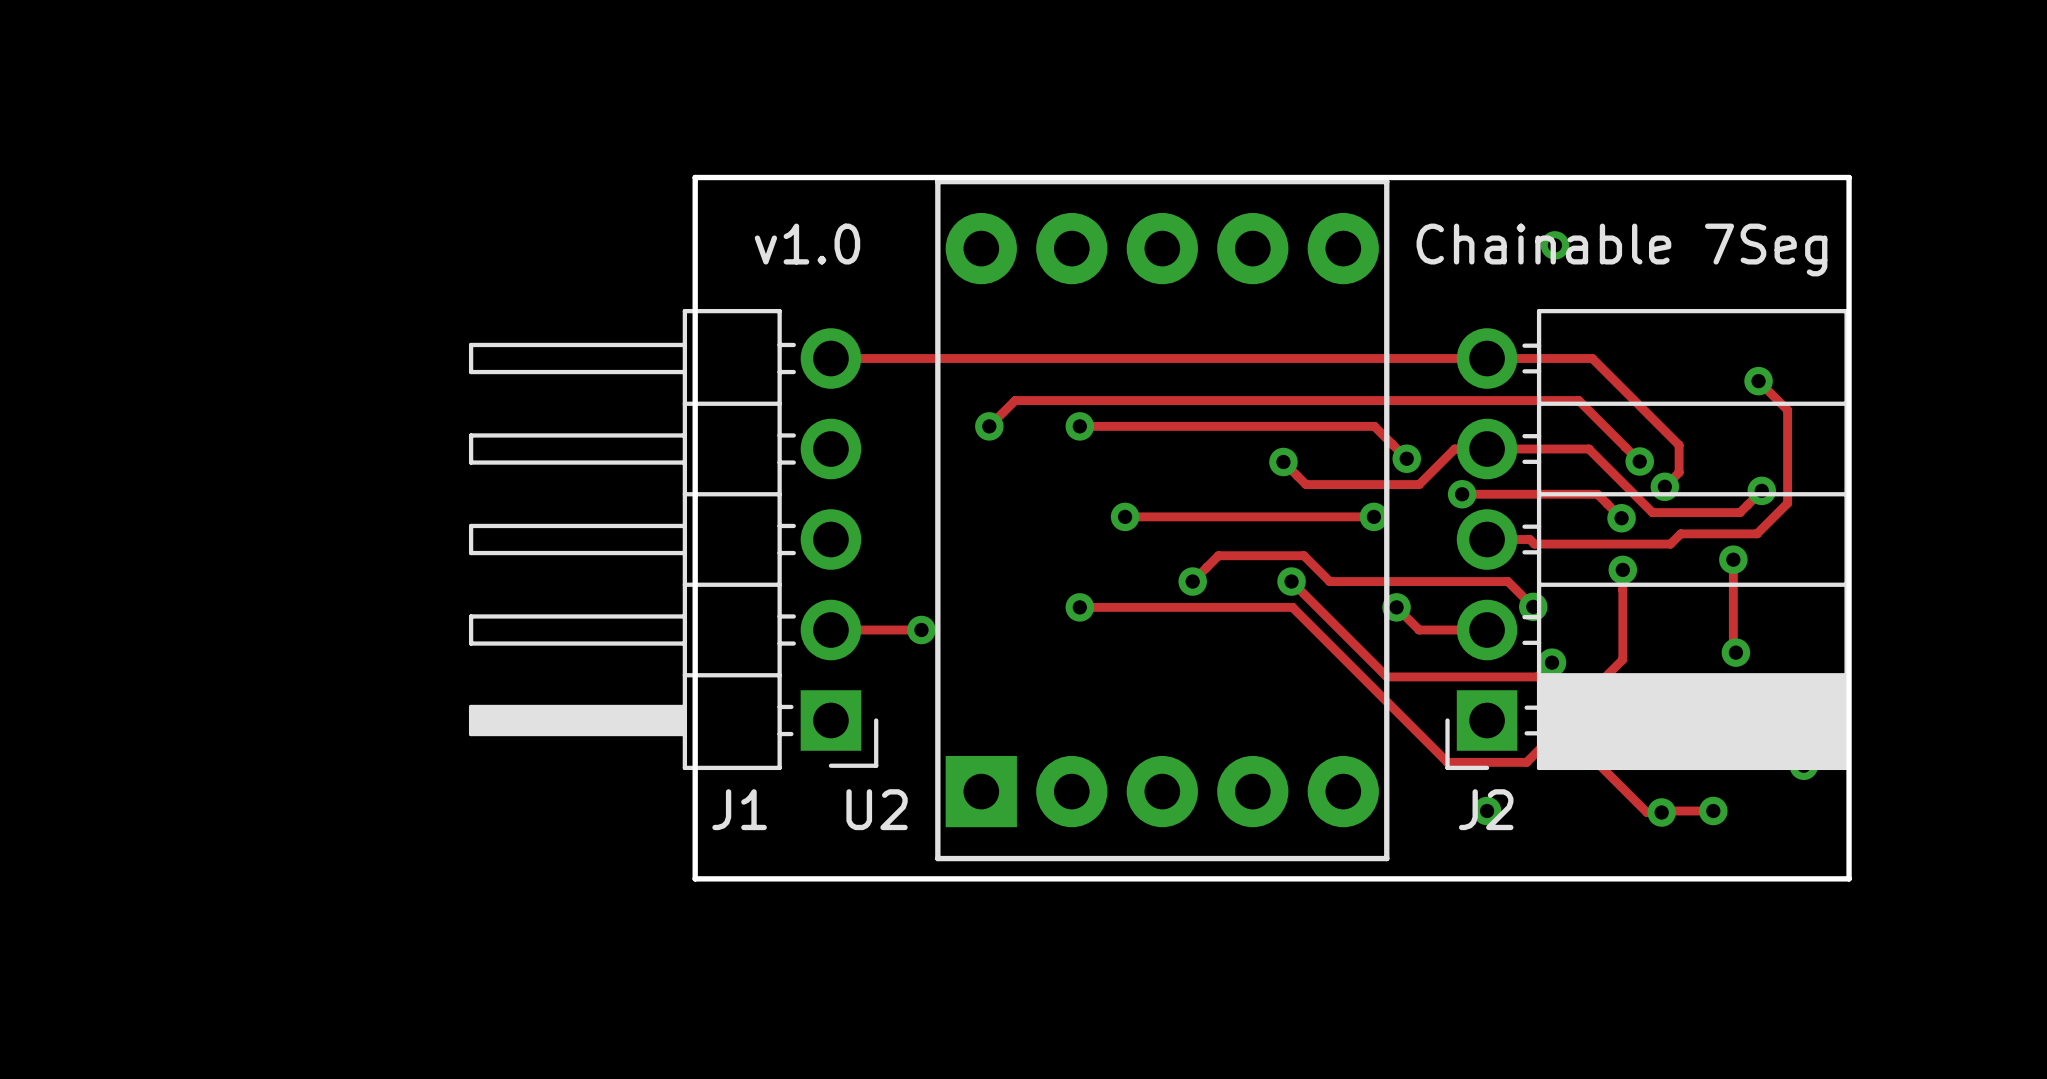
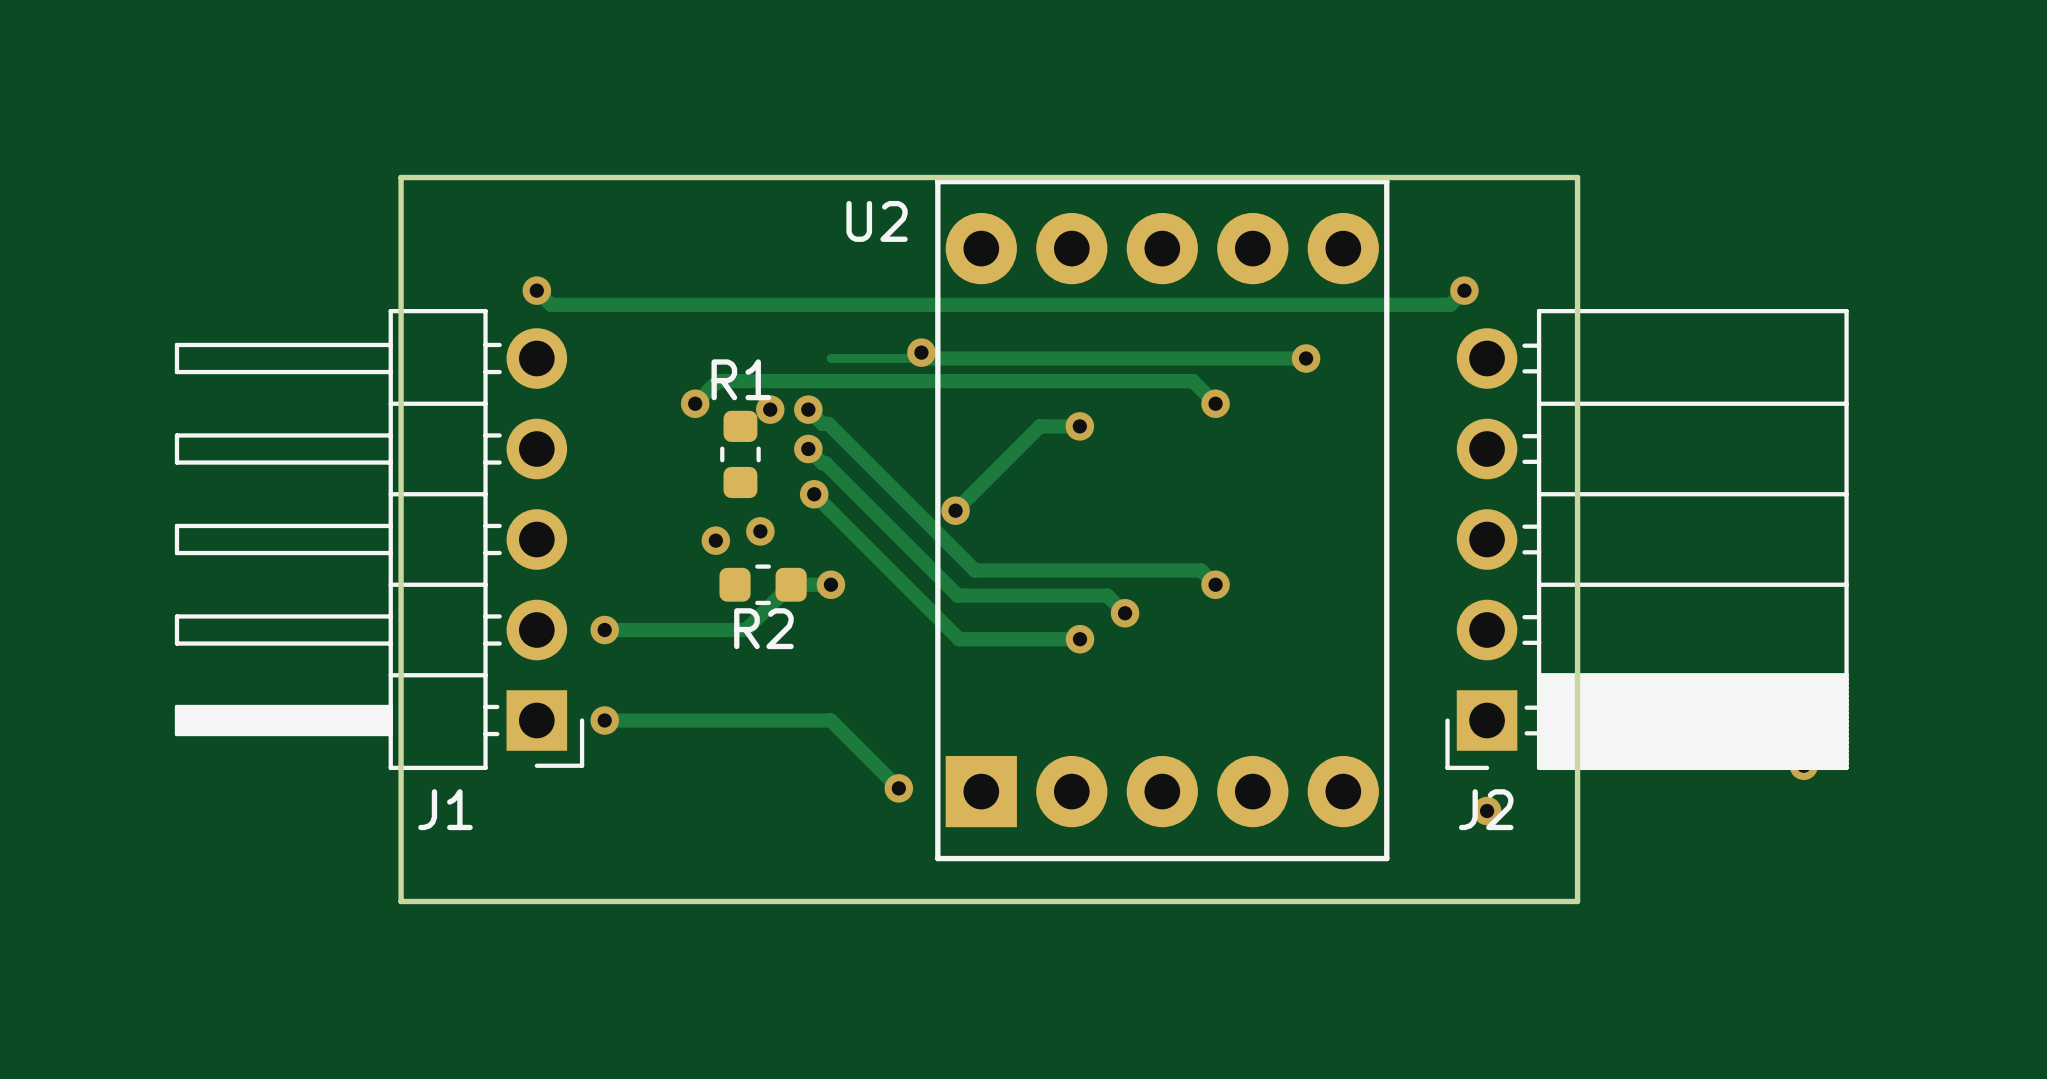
board edge: (695, 177) (695, 878) (1849, 878) (1849, 177) (1577, 177) -> (695, 177) (401, 177) (401, 901) (1577, 901) (1577, 177)
text: v1.0 (807, 244) -> none
via: (1554, 245) -> none
text: Chainable 7Seg (1621, 249) -> none
track: none -> (536, 290) (551, 304) (1450, 304) (1464, 290)
via: none -> (536, 290)
via: none -> (1464, 290)
via: none -> (921, 352)
track width: thin (927, 358) (1306, 358) -> thick (927, 358) (1306, 358)
track: (1306, 358) (1592, 358) (1679, 445) (1679, 472) (1664, 486) -> none
via: none -> (1306, 358)
track: (1758, 381) (1787, 410) (1787, 503) (1757, 533) (1680, 533) (1670, 544) (1534, 544) (1529, 539) (1487, 539) -> none
via: (1758, 381) -> none
track: none -> (695, 403) (717, 381) (1192, 381) (1215, 403)
via: none -> (695, 403)
via: none -> (1215, 403)
via: none -> (770, 409)
track: none -> (808, 409) (822, 423) (828, 423) (975, 570) (1201, 570) (1215, 584)
via: none -> (808, 409)
track: (989, 426) (1015, 400) (1578, 400) (1639, 461) -> none
via: (989, 426) -> none
track: (1079, 426) (1374, 426) (1406, 458) -> (1079, 426) (1039, 426) (955, 510)
track: none -> (808, 449) (822, 463) (825, 463) (957, 595) (1107, 595) (1125, 613)
via: none -> (808, 449)
R1: none -> (740, 454)
via: (1406, 458) -> none
via: (1639, 461) -> none
track: (1283, 462) (1306, 484) (1419, 484) (1454, 449) (1588, 449) (1652, 512) (1740, 512) (1761, 490) -> none
via: (1283, 462) -> none
via: (1664, 486) -> none
via: (1761, 490) -> none
track: none -> (814, 494) (959, 639) (1080, 639)
via: none -> (814, 494)
track: (1462, 494) (1597, 494) (1621, 518) -> none
via: (1462, 494) -> none
via: none -> (955, 510)
track: (1125, 516) (1373, 516) -> none
via: (1125, 516) -> none
via: (1373, 516) -> none
via: (1621, 518) -> none
via: none -> (760, 531)
J1 position: (673, 539) -> (379, 539)
via: none -> (715, 540)
track: (1733, 559) (1733, 650) (1735, 652) -> none
via: (1733, 559) -> none
track: (1622, 569) (1622, 659) (1551, 730) (1551, 737) (1526, 762) (1447, 762) (1292, 607) (1079, 607) -> none
via: (1622, 569) -> none
track: (1192, 581) (1218, 555) (1303, 555) (1329, 581) (1507, 581) (1533, 606) -> none
via position: (1192, 581) -> (1215, 584)
track: (1291, 581) (1386, 676) (1537, 676) (1551, 662) -> none
via: (1291, 581) -> none
R2: none -> (763, 584)
track: none -> (830, 584) (791, 584) (745, 630) (604, 630)
via: none -> (830, 584)
via: (1533, 606) -> none
via: (1079, 607) -> none
track: (1396, 607) (1419, 630) (1487, 630) -> none
via: (1396, 607) -> none
via: none -> (1125, 613)
via: none -> (604, 630)
track: (830, 630) (921, 630) -> none
via: (921, 630) -> none
via: none -> (1080, 639)
via: (1735, 652) -> none
via: (1551, 662) -> none
track: none -> (604, 720) (830, 720) (898, 788)
via: none -> (604, 720)
track: (1577, 743) (1646, 812) (1713, 811) -> none
via: none -> (898, 788)
U2 name position: U2 (877, 809) -> U2 (877, 221)
via: (1713, 811) -> none
via: (1661, 812) -> none

